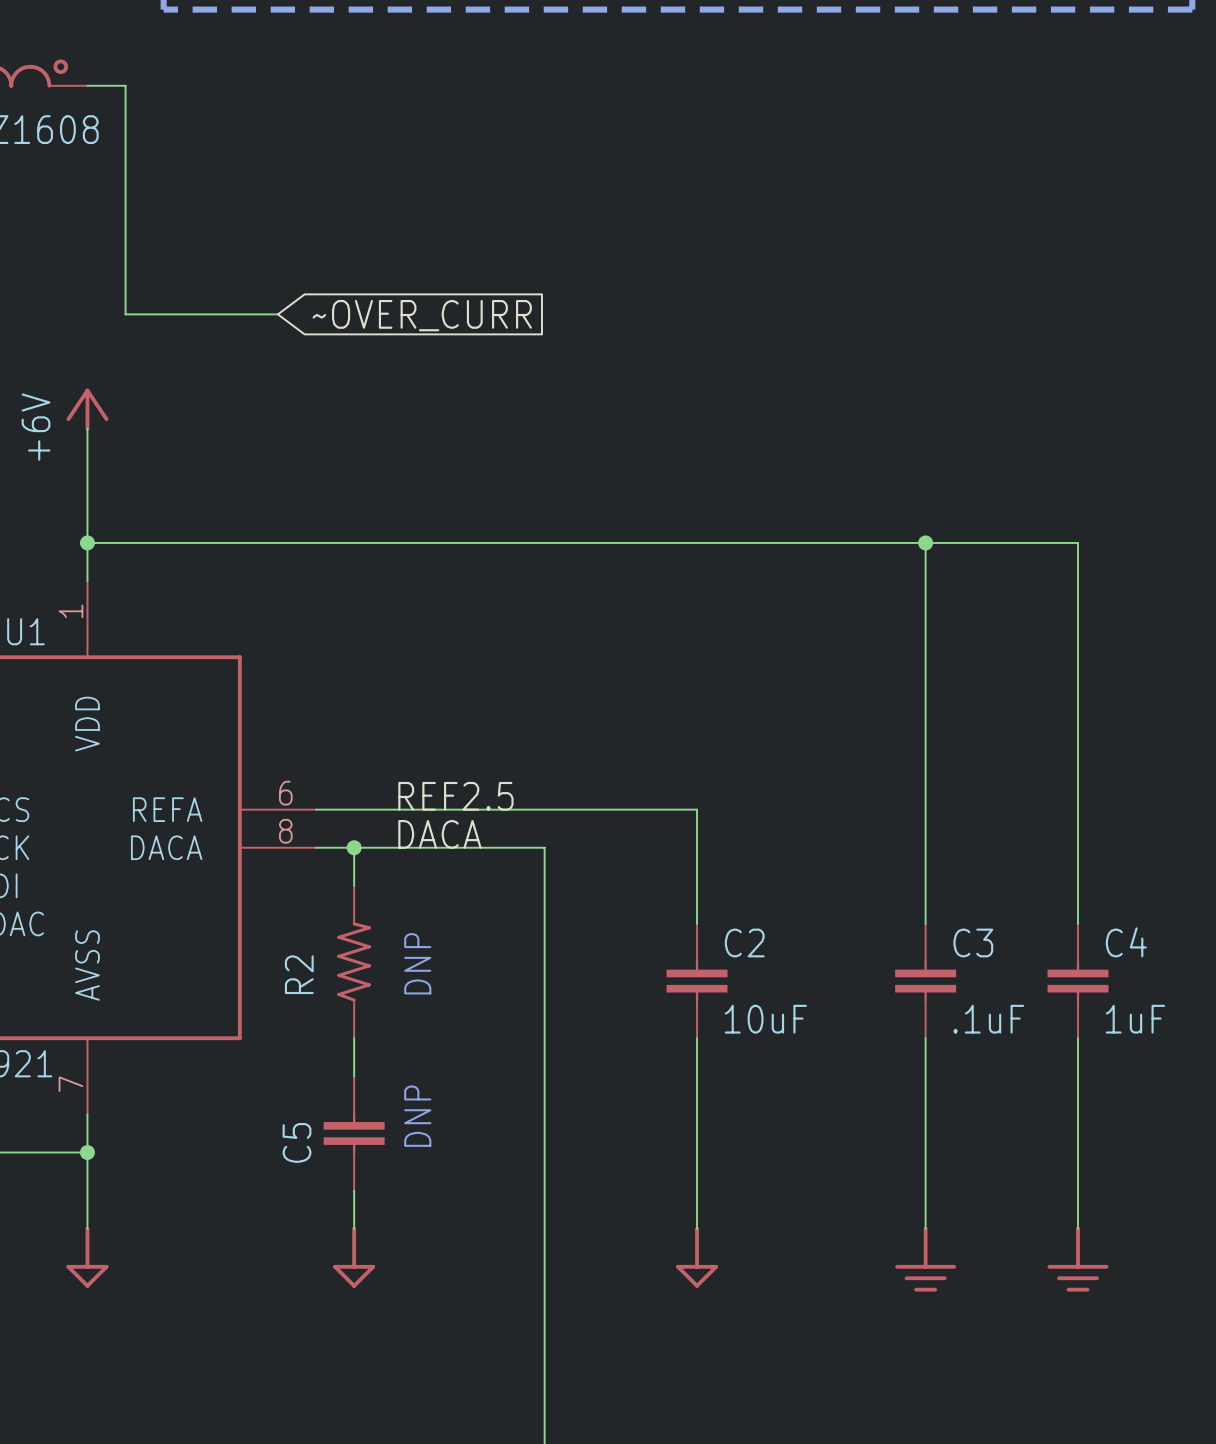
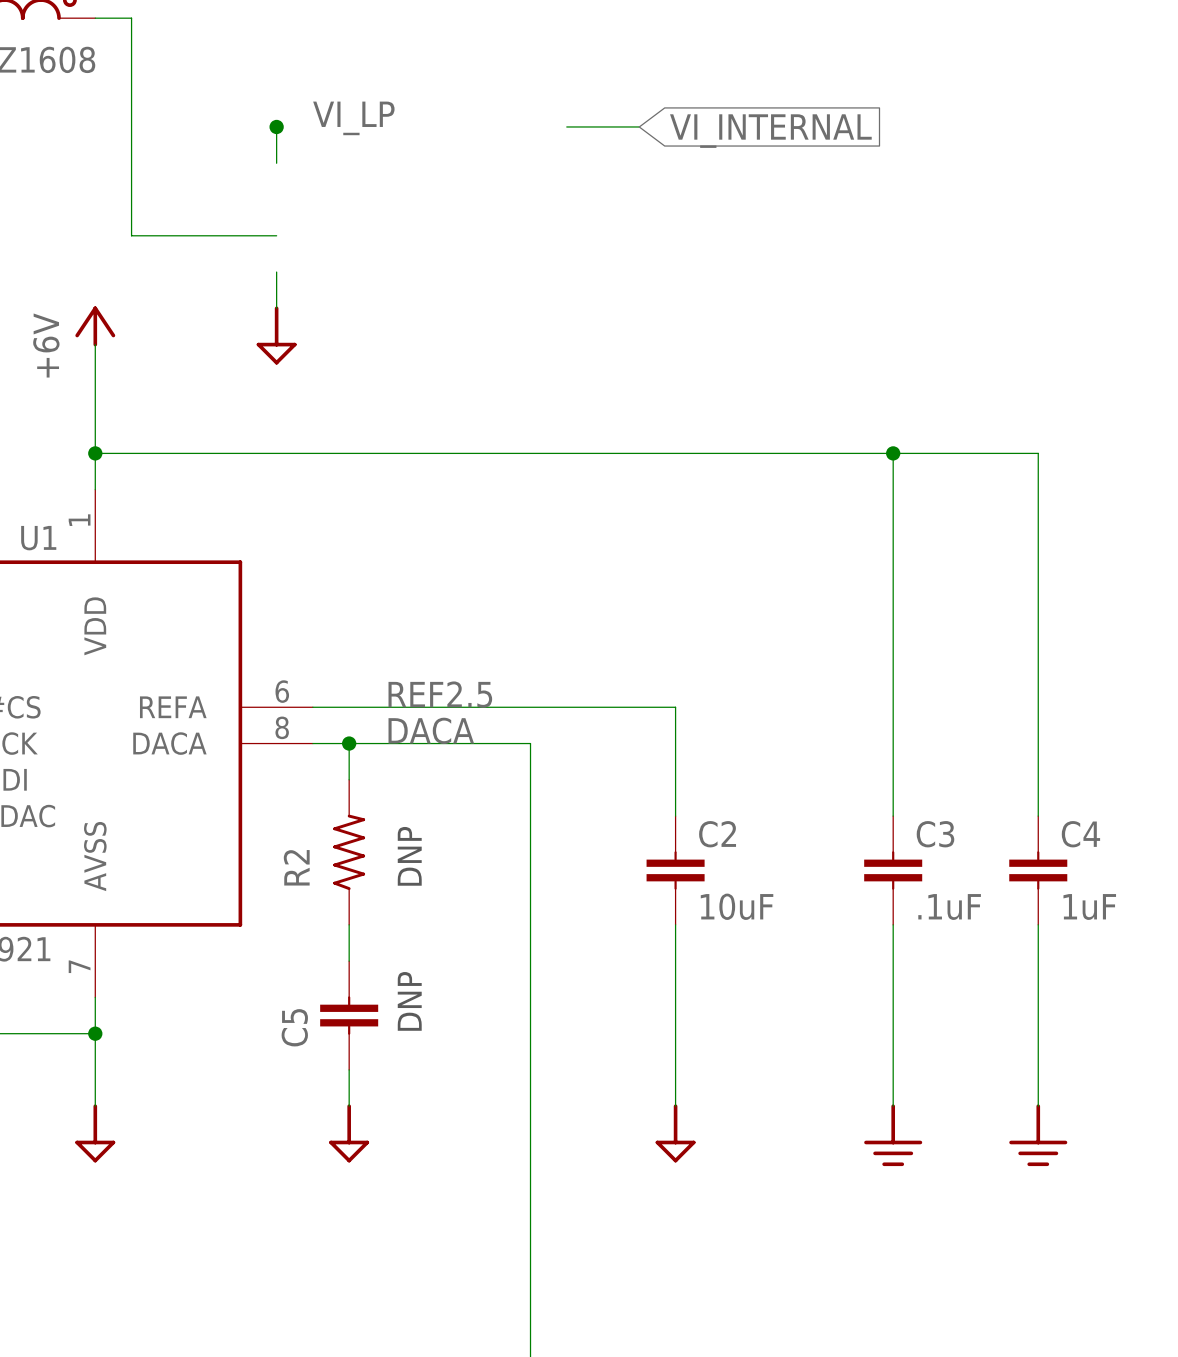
label: none -> VI_LP (353, 118)
wire: none -> (276, 126) (276, 163)
junction: none -> (276, 126)
wire: none -> (566, 126) (639, 126)
global label: none -> VI_INTERNAL (770, 131)
global label: ~OVER_CURR (422, 315) -> none
wire: none -> (276, 272) (276, 308)
part: none -> (276, 335)

